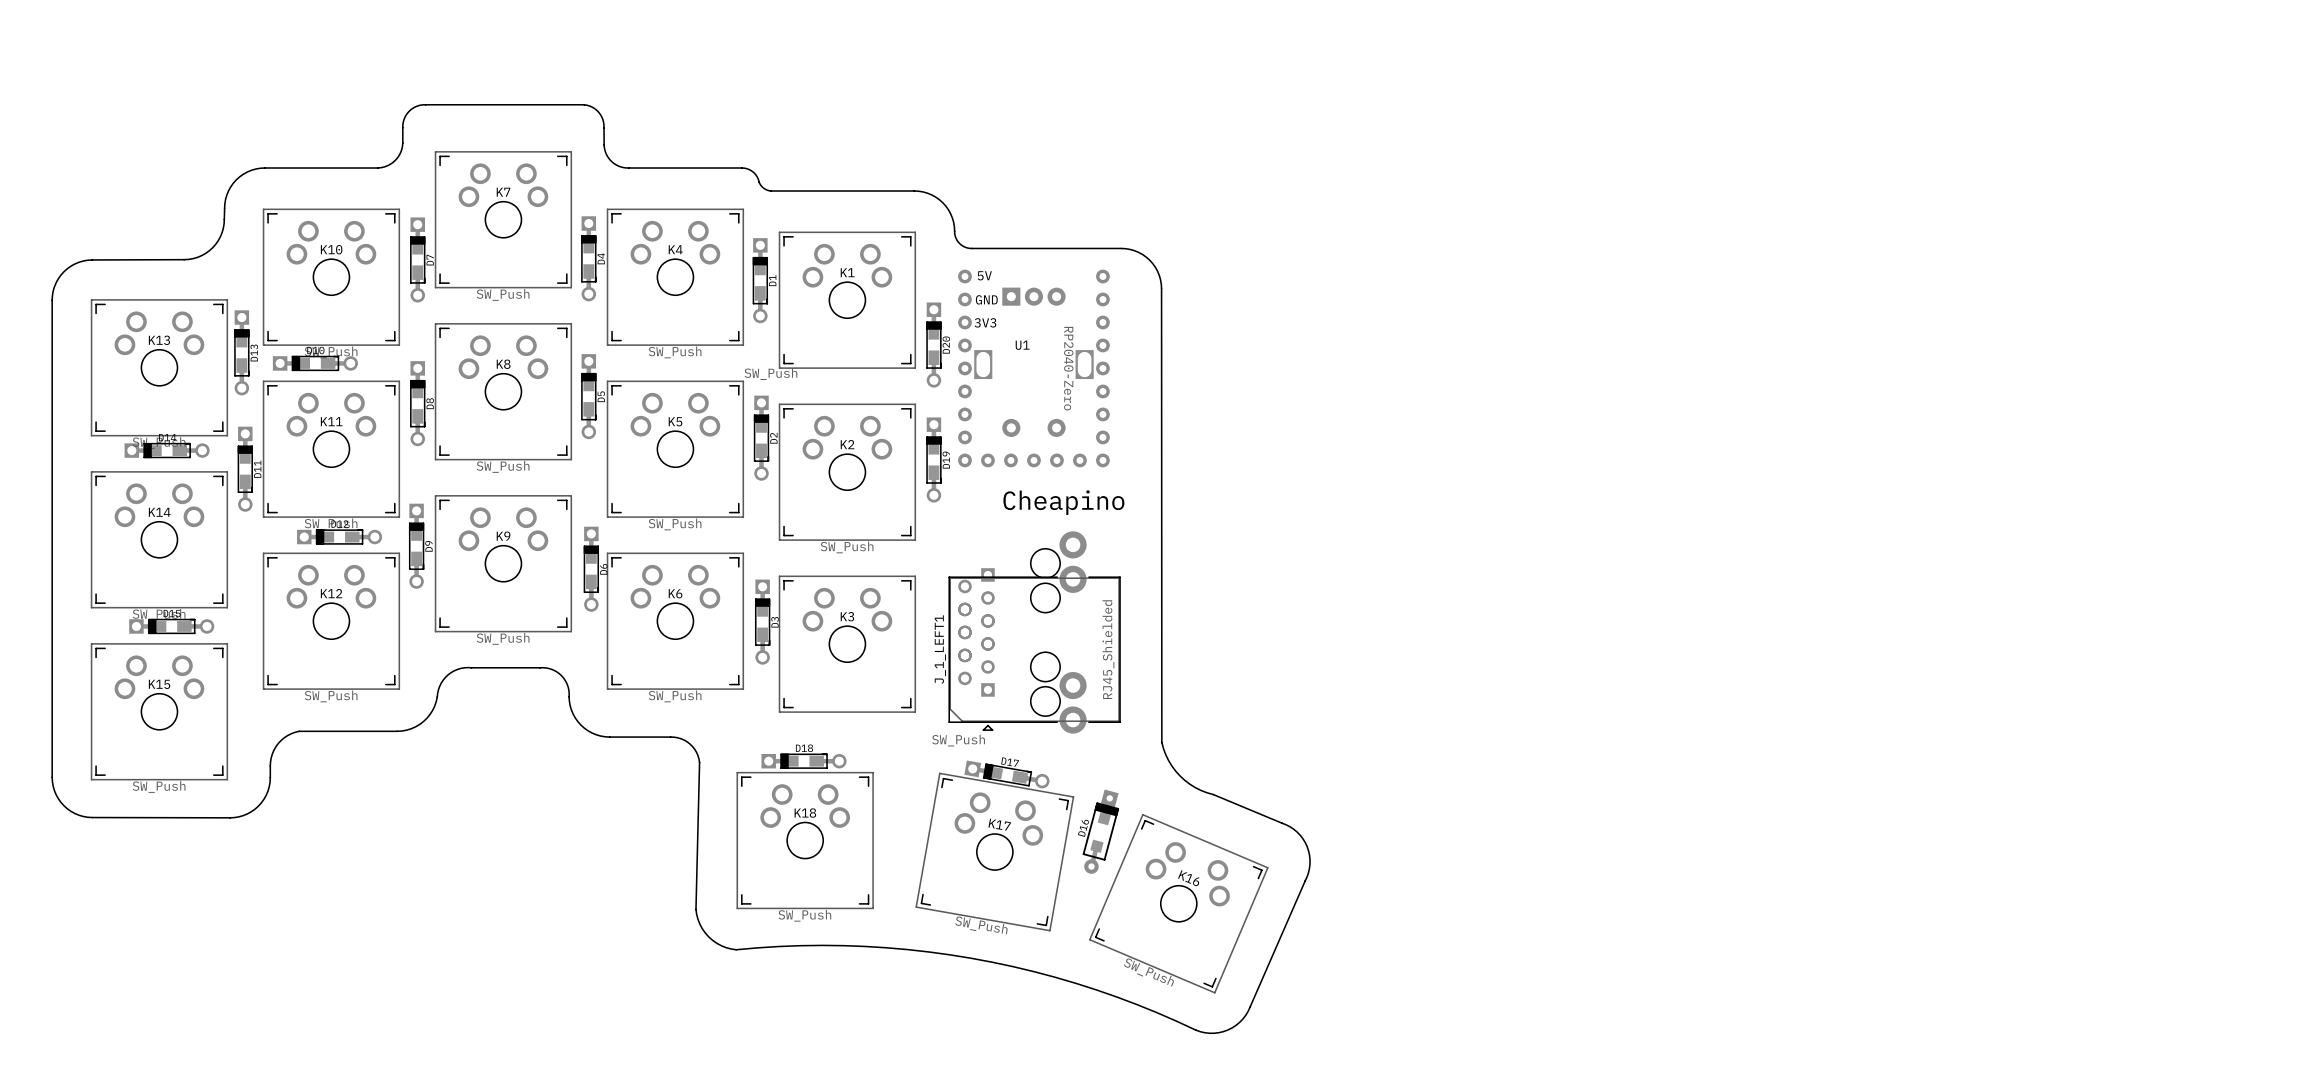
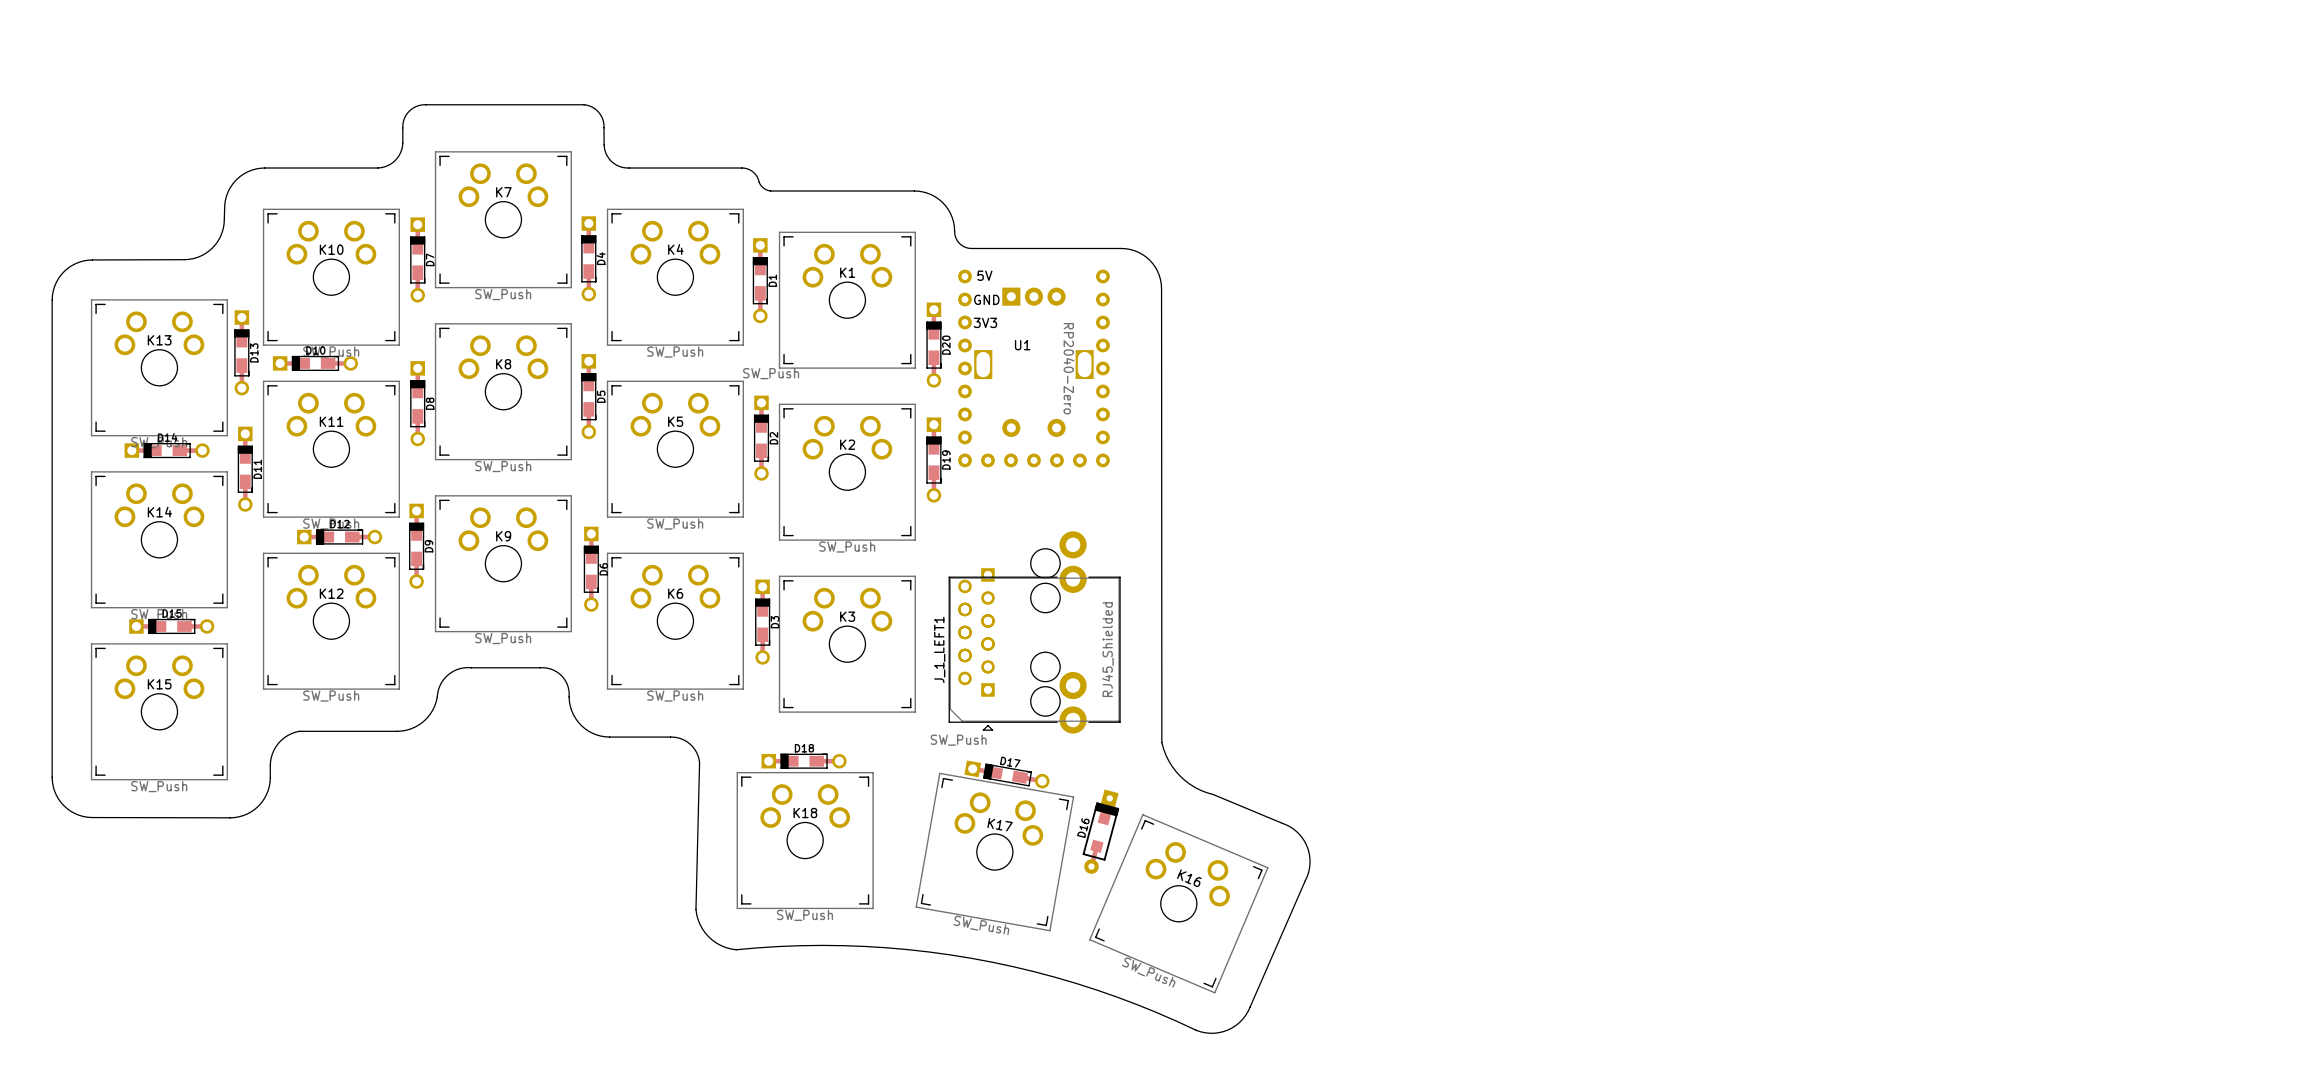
text: Cheapino (1063, 502) -> none

